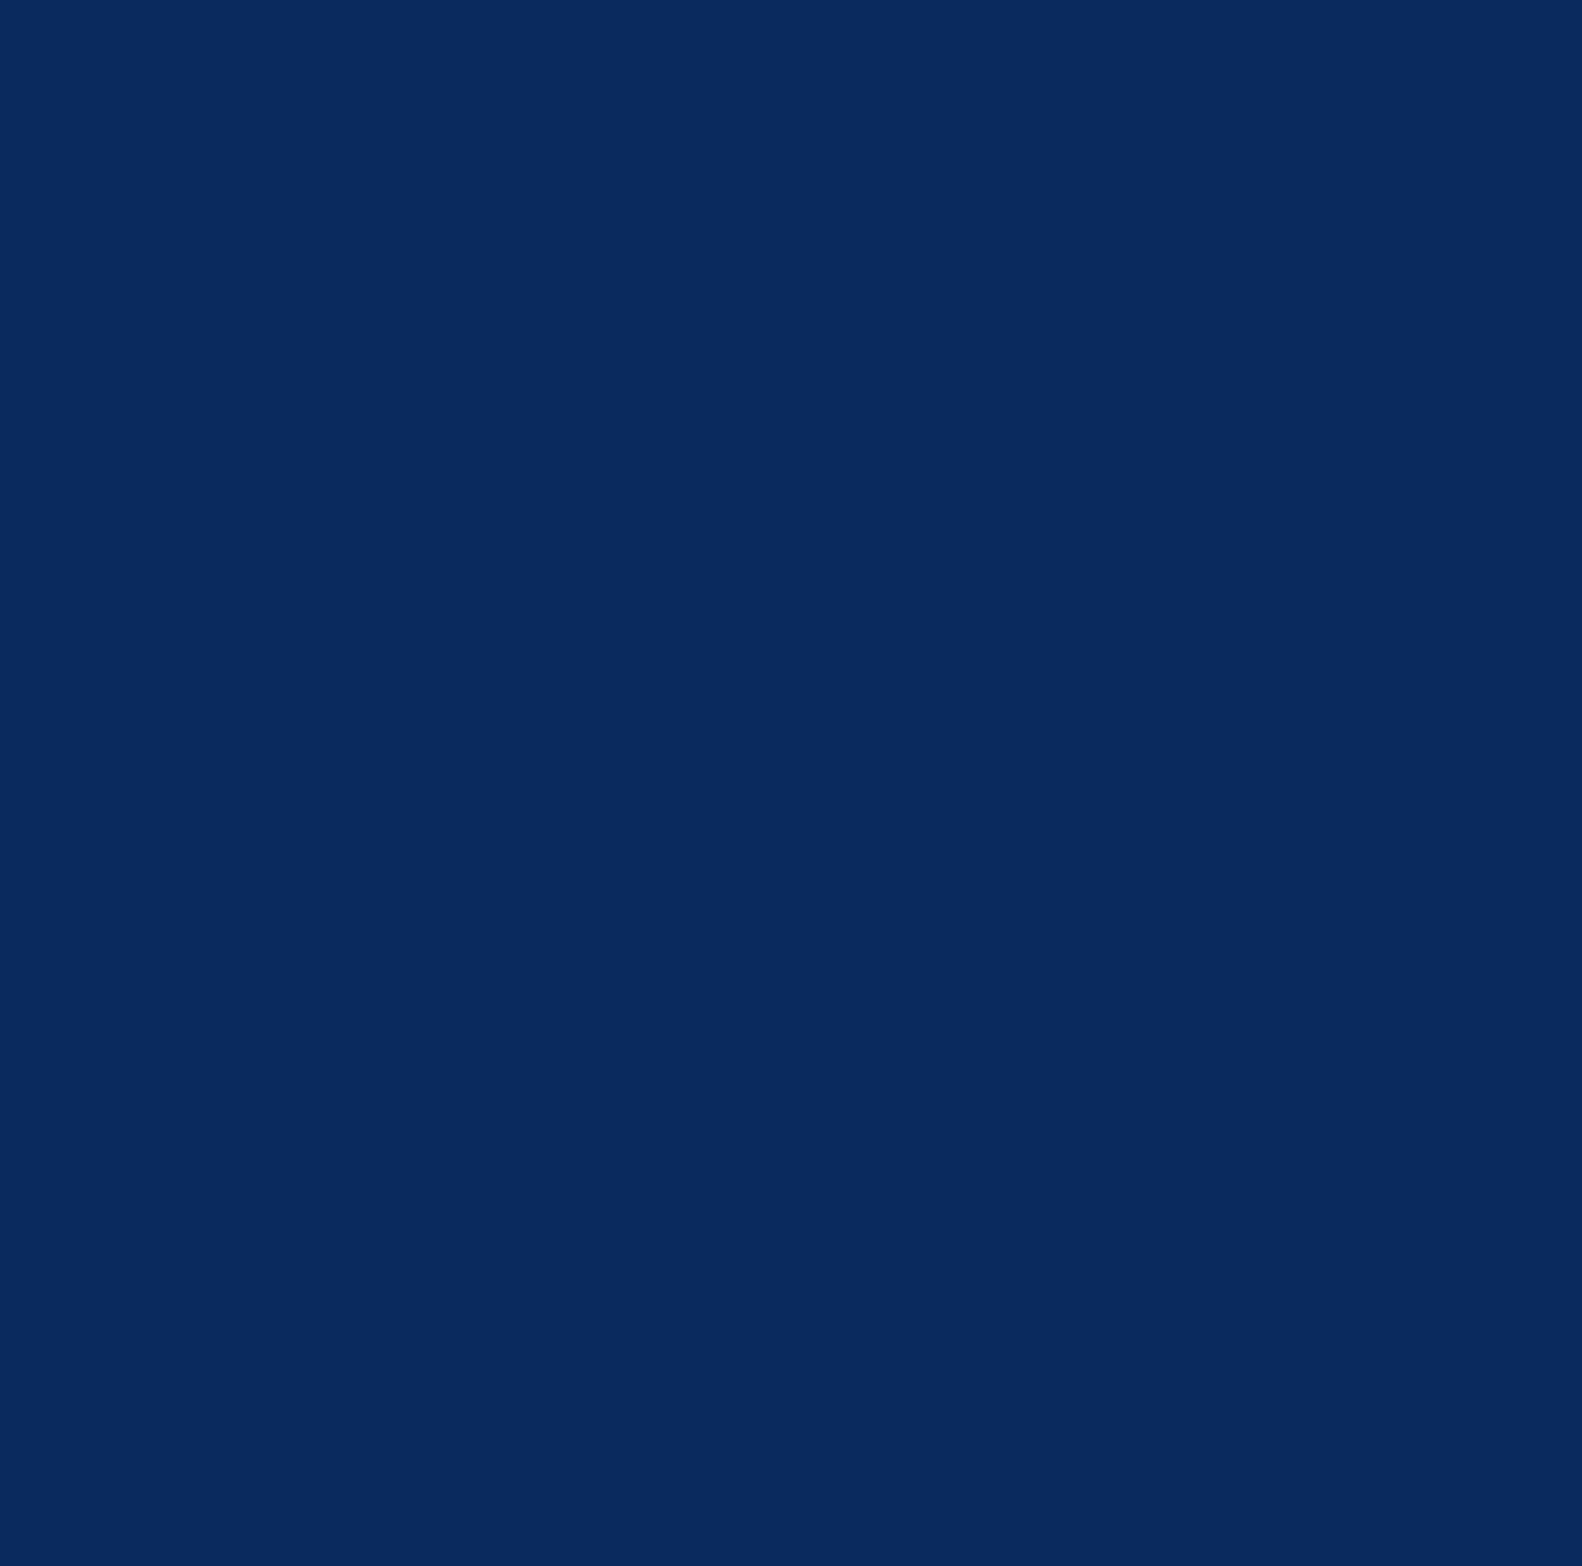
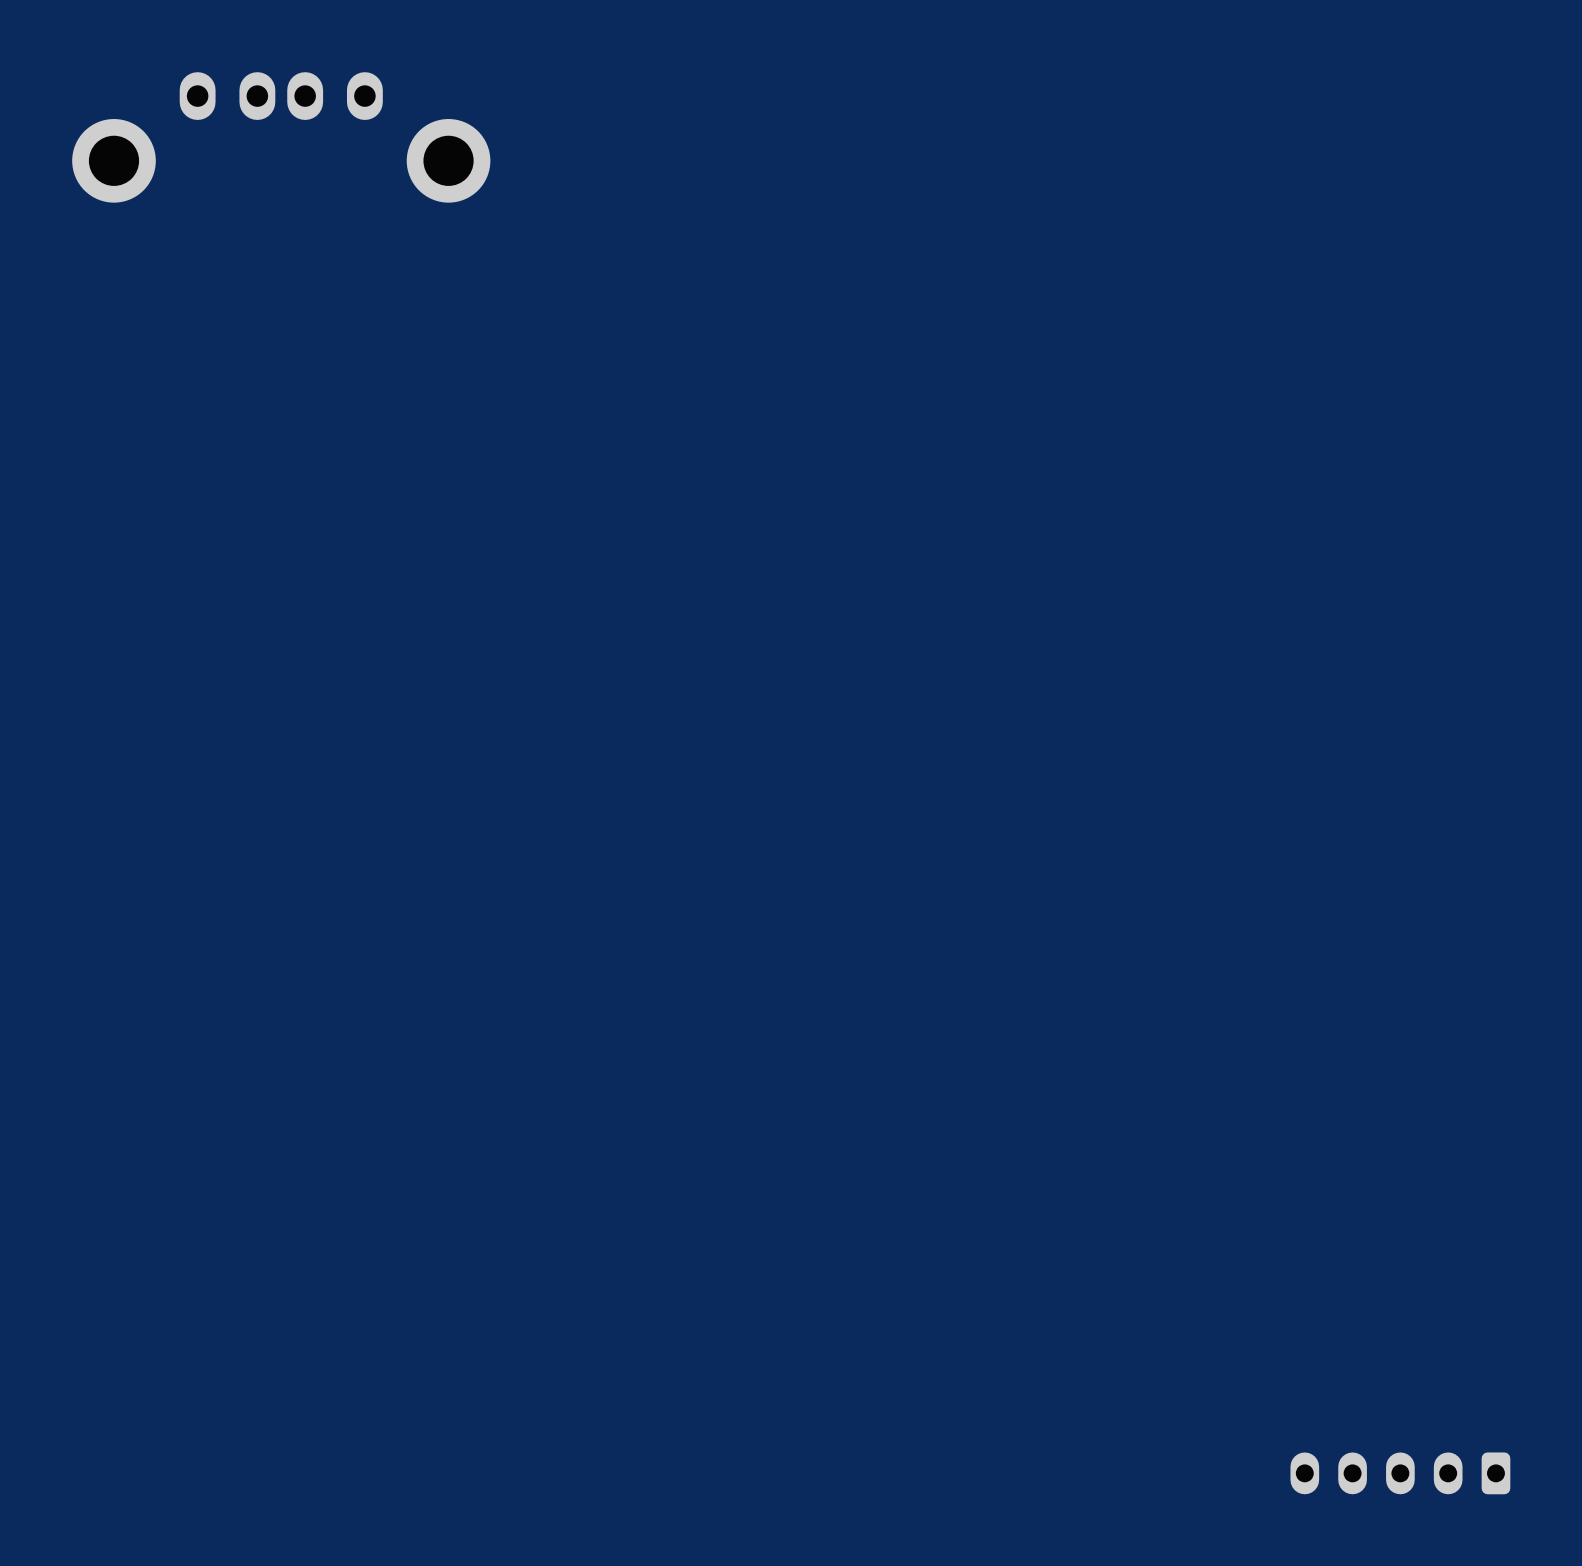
part: none -> (281, 137)
part: none -> (1400, 1473)

